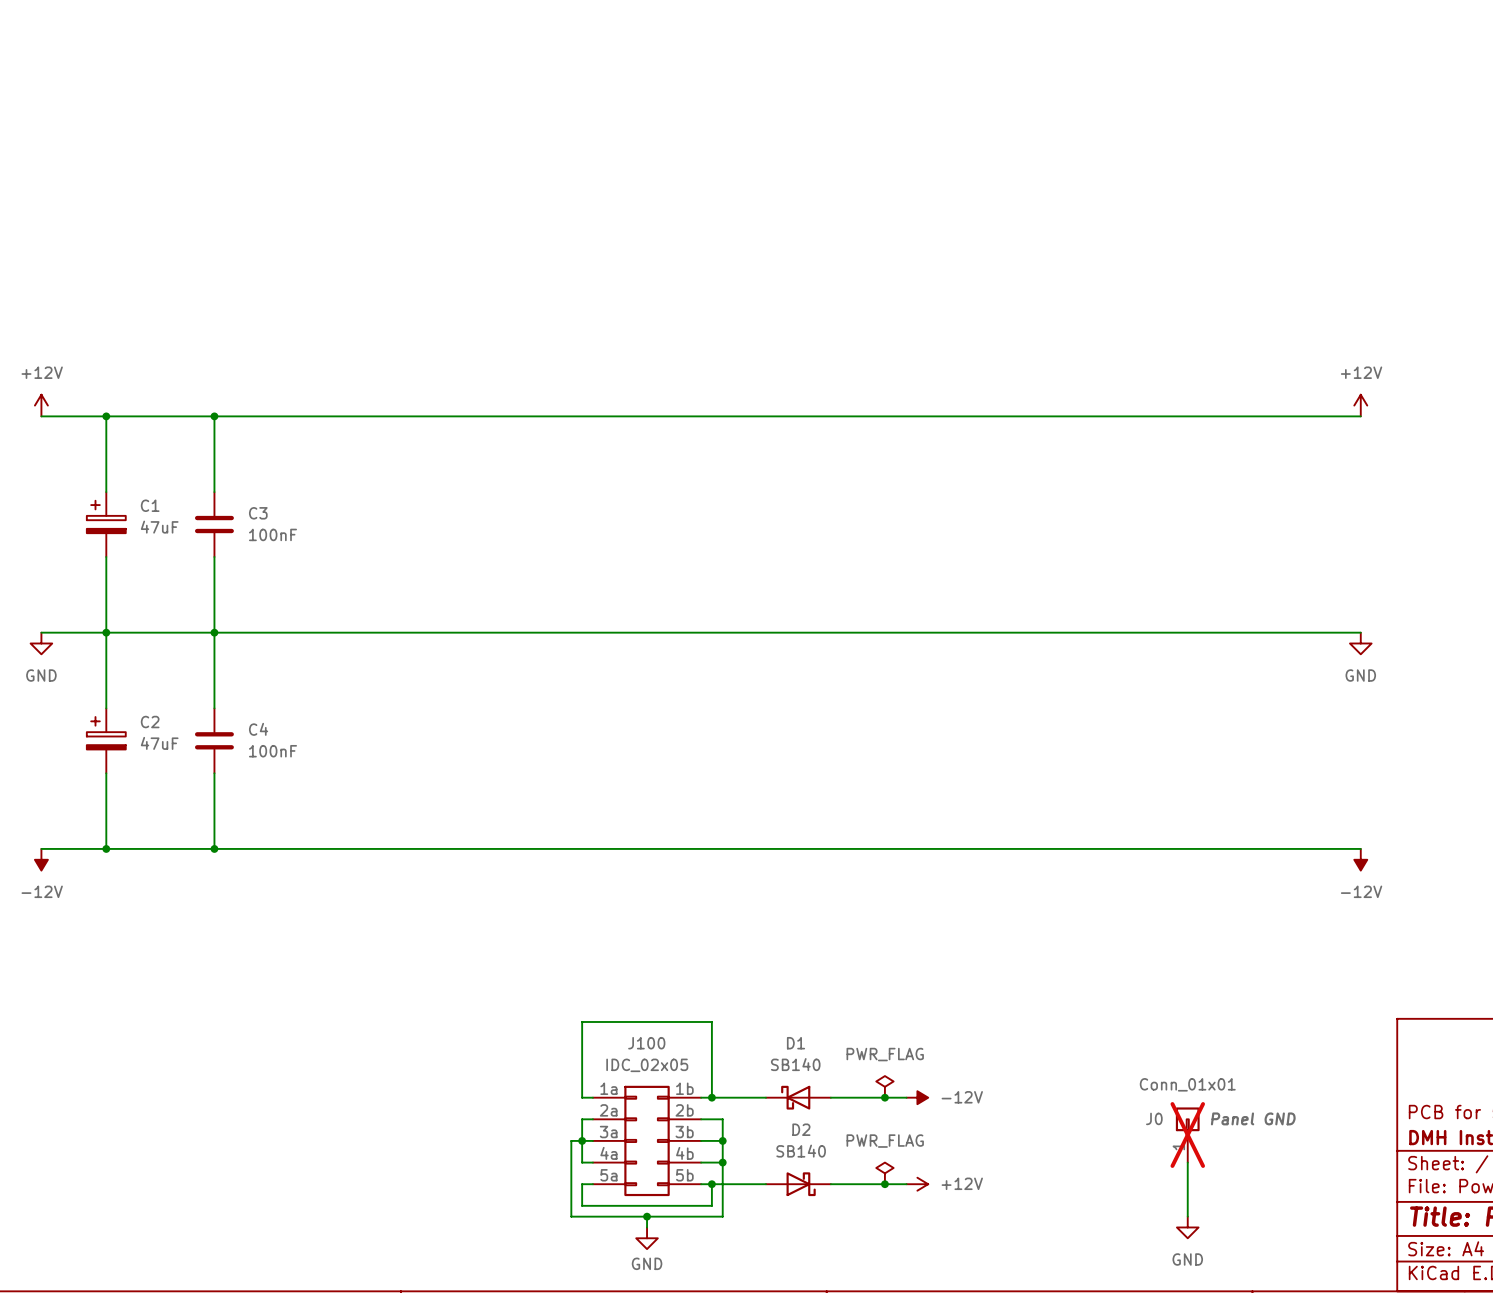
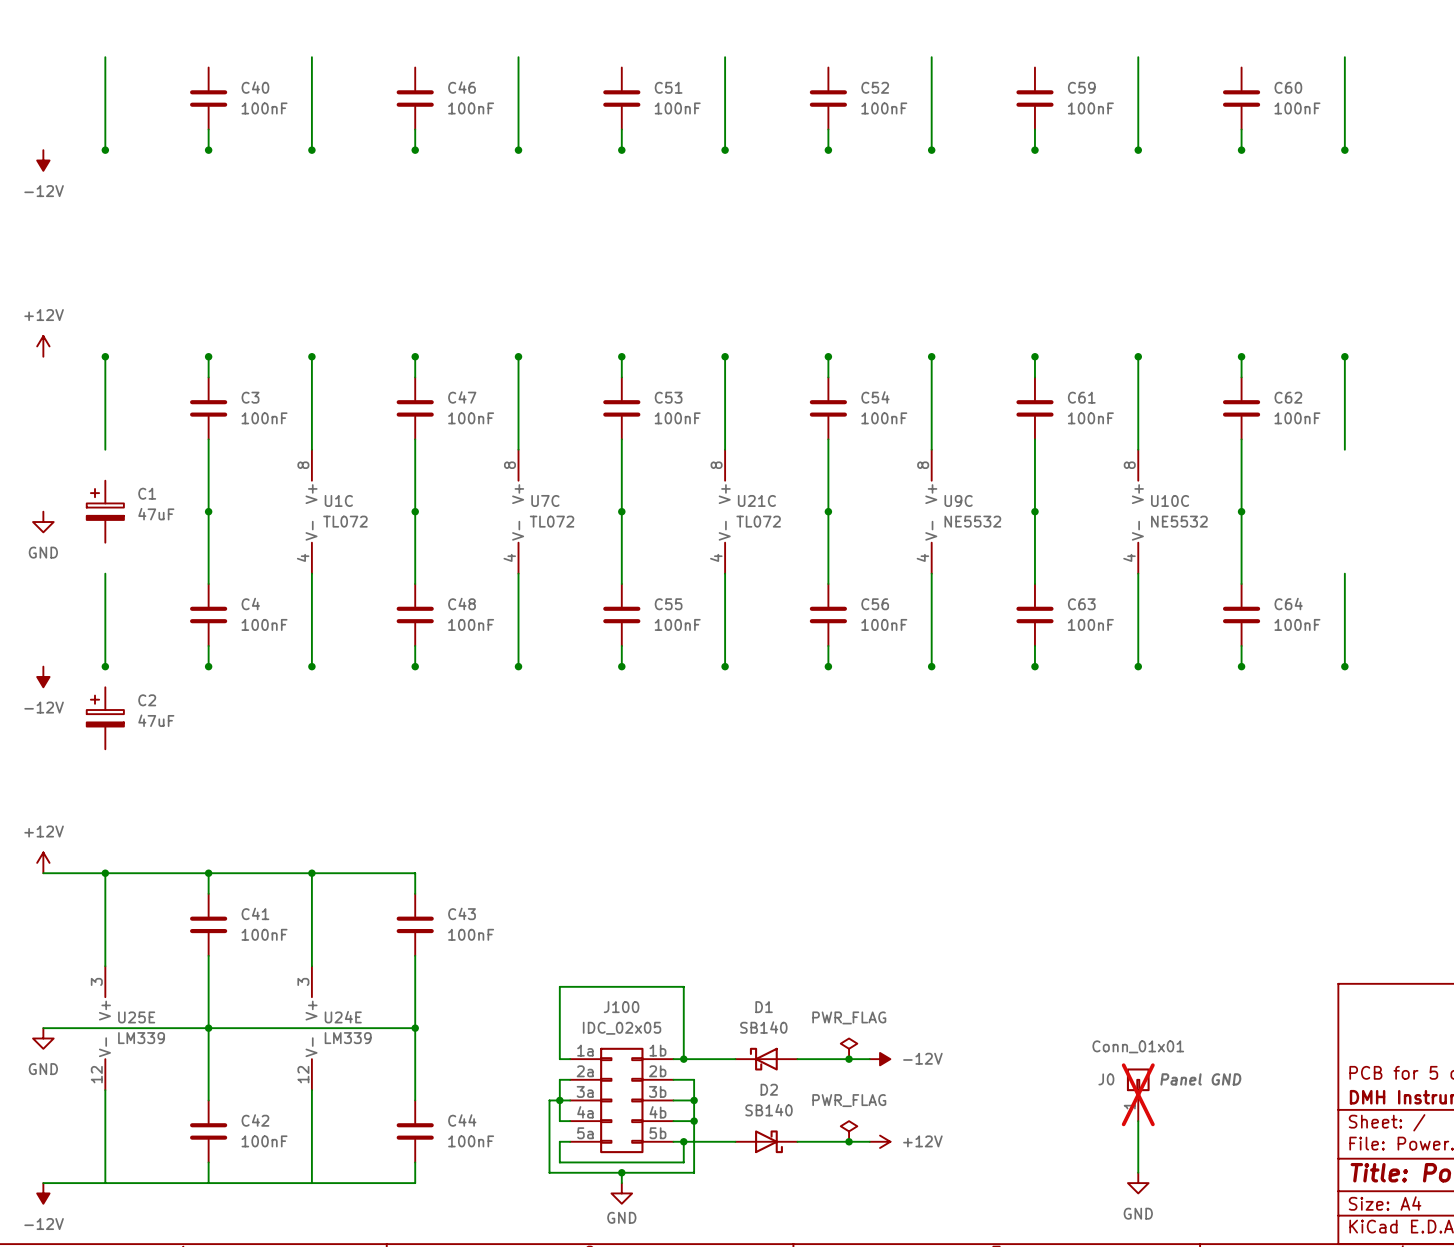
wire: none -> (105, 57) (105, 150)
wire: none -> (311, 57) (311, 150)
wire: none -> (518, 57) (518, 150)
wire: none -> (725, 57) (725, 150)
wire: none -> (931, 57) (931, 150)
wire: none -> (1138, 57) (1138, 150)
wire: none -> (1344, 57) (1344, 150)
C40: none -> 100nF (208, 98)
C46: none -> 100nF (415, 98)
C51: none -> 100nF (621, 98)
C52: none -> 100nF (828, 98)
C59: none -> 100nF (1034, 98)
C60: none -> 100nF (1241, 98)
wire: none -> (208, 129) (208, 150)
wire: none -> (415, 129) (415, 150)
wire: none -> (621, 129) (621, 150)
wire: none -> (828, 129) (828, 150)
wire: none -> (1034, 129) (1034, 150)
wire: none -> (1241, 129) (1241, 150)
junction: none -> (105, 150)
junction: none -> (208, 150)
junction: none -> (311, 150)
junction: none -> (415, 150)
junction: none -> (518, 150)
junction: none -> (621, 150)
junction: none -> (725, 150)
junction: none -> (828, 150)
junction: none -> (931, 150)
junction: none -> (1034, 150)
junction: none -> (1138, 150)
junction: none -> (1241, 150)
junction: none -> (1344, 150)
power symbol: none -> -12V (43, 160)
wire: none -> (105, 356) (105, 408)
junction: none -> (105, 356)
wire: none -> (208, 356) (208, 377)
junction: none -> (208, 356)
wire: none -> (311, 356) (311, 449)
junction: none -> (311, 356)
wire: none -> (415, 356) (415, 377)
junction: none -> (415, 356)
wire: none -> (518, 356) (518, 449)
junction: none -> (518, 356)
wire: none -> (621, 356) (621, 377)
junction: none -> (621, 356)
wire: none -> (725, 356) (725, 449)
junction: none -> (725, 356)
wire: none -> (828, 356) (828, 377)
junction: none -> (828, 356)
wire: none -> (931, 356) (931, 449)
junction: none -> (931, 356)
wire: none -> (1034, 356) (1034, 377)
junction: none -> (1034, 356)
wire: none -> (1138, 356) (1138, 449)
junction: none -> (1138, 356)
wire: none -> (1241, 356) (1241, 377)
junction: none -> (1241, 356)
wire: none -> (1344, 356) (1344, 449)
junction: none -> (1344, 356)
power symbol position: +12V (41, 405) -> +12V (43, 346)
power symbol: +12V (1360, 405) -> none
wire: (41, 416) (1360, 416) -> none
junction: (106, 416) -> none
junction: (214, 416) -> none
C47: none -> 100nF (415, 408)
C53: none -> 100nF (621, 408)
C54: none -> 100nF (828, 408)
C61: none -> 100nF (1034, 408)
C62: none -> 100nF (1241, 408)
wire: none -> (415, 439) (415, 583)
wire: none -> (621, 439) (621, 583)
wire: none -> (828, 439) (828, 583)
wire: none -> (1034, 439) (1034, 583)
wire: none -> (1241, 439) (1241, 583)
wire: (106, 459) (106, 492) -> none
junction: none -> (208, 511)
C3 position: (214, 524) -> (208, 408)
U1C: none -> TL072 (311, 511)
junction: none -> (415, 511)
U7C: none -> TL072 (518, 511)
junction: none -> (621, 511)
U21C: none -> TL072 (725, 511)
junction: none -> (828, 511)
U9C: none -> NE5532 (931, 511)
junction: none -> (1034, 511)
U10C: none -> NE5532 (1138, 511)
junction: none -> (1241, 511)
wire: (106, 556) (106, 589) -> none
wire: none -> (311, 573) (311, 666)
wire: none -> (518, 573) (518, 666)
wire: none -> (725, 573) (725, 666)
wire: none -> (931, 573) (931, 666)
wire: none -> (1138, 573) (1138, 666)
wire: none -> (1344, 573) (1344, 666)
wire: (41, 632) (1360, 632) -> none
junction: (106, 632) -> none
junction: (214, 632) -> none
C48: none -> 100nF (415, 614)
C55: none -> 100nF (621, 614)
C56: none -> 100nF (828, 614)
C63: none -> 100nF (1034, 614)
C64: none -> 100nF (1241, 614)
power symbol position: GND (41, 643) -> GND (43, 522)
power symbol: GND (1360, 643) -> none
wire: none -> (415, 645) (415, 666)
wire: none -> (621, 645) (621, 666)
wire: none -> (828, 645) (828, 666)
wire: none -> (1034, 645) (1034, 666)
wire: none -> (1241, 645) (1241, 666)
wire: (106, 686) (106, 708) -> none
junction: none -> (105, 666)
wire: (214, 686) (214, 708) -> none
junction: none -> (208, 666)
junction: none -> (311, 666)
junction: none -> (415, 666)
junction: none -> (518, 666)
junction: none -> (621, 666)
junction: none -> (725, 666)
junction: none -> (828, 666)
junction: none -> (931, 666)
junction: none -> (1034, 666)
junction: none -> (1138, 666)
junction: none -> (1241, 666)
junction: none -> (1344, 666)
C4 position: (214, 740) -> (208, 614)
wire: (106, 773) (106, 848) -> none
wire: (214, 773) (214, 848) -> none
wire: (41, 848) (1360, 848) -> none
junction: (106, 848) -> none
junction: (214, 848) -> none
power symbol position: -12V (41, 859) -> -12V (43, 676)
power symbol: -12V (1360, 859) -> none
power symbol: none -> +12V (43, 862)
wire: none -> (43, 873) (415, 873) (415, 893)
wire: none -> (105, 873) (105, 966)
junction: none -> (105, 873)
wire: none -> (208, 873) (208, 893)
junction: none -> (208, 873)
wire: none -> (311, 873) (311, 966)
junction: none -> (311, 873)
C41: none -> 100nF (208, 924)
C43: none -> 100nF (415, 924)
wire: none -> (208, 955) (208, 1100)
wire: none -> (415, 955) (415, 1100)
wire: none -> (43, 1028) (415, 1028)
U25E: none -> LM339 (105, 1028)
junction: none -> (208, 1028)
U24E: none -> LM339 (311, 1028)
junction: none -> (415, 1028)
power symbol: none -> GND (43, 1038)
wire: none -> (105, 1090) (105, 1183)
wire: none -> (311, 1090) (311, 1183)
C42: none -> 100nF (208, 1131)
C44: none -> 100nF (415, 1131)
wire: none -> (208, 1162) (208, 1183)
wire: none -> (415, 1162) (415, 1183) (43, 1183)
power symbol: none -> -12V (43, 1193)

